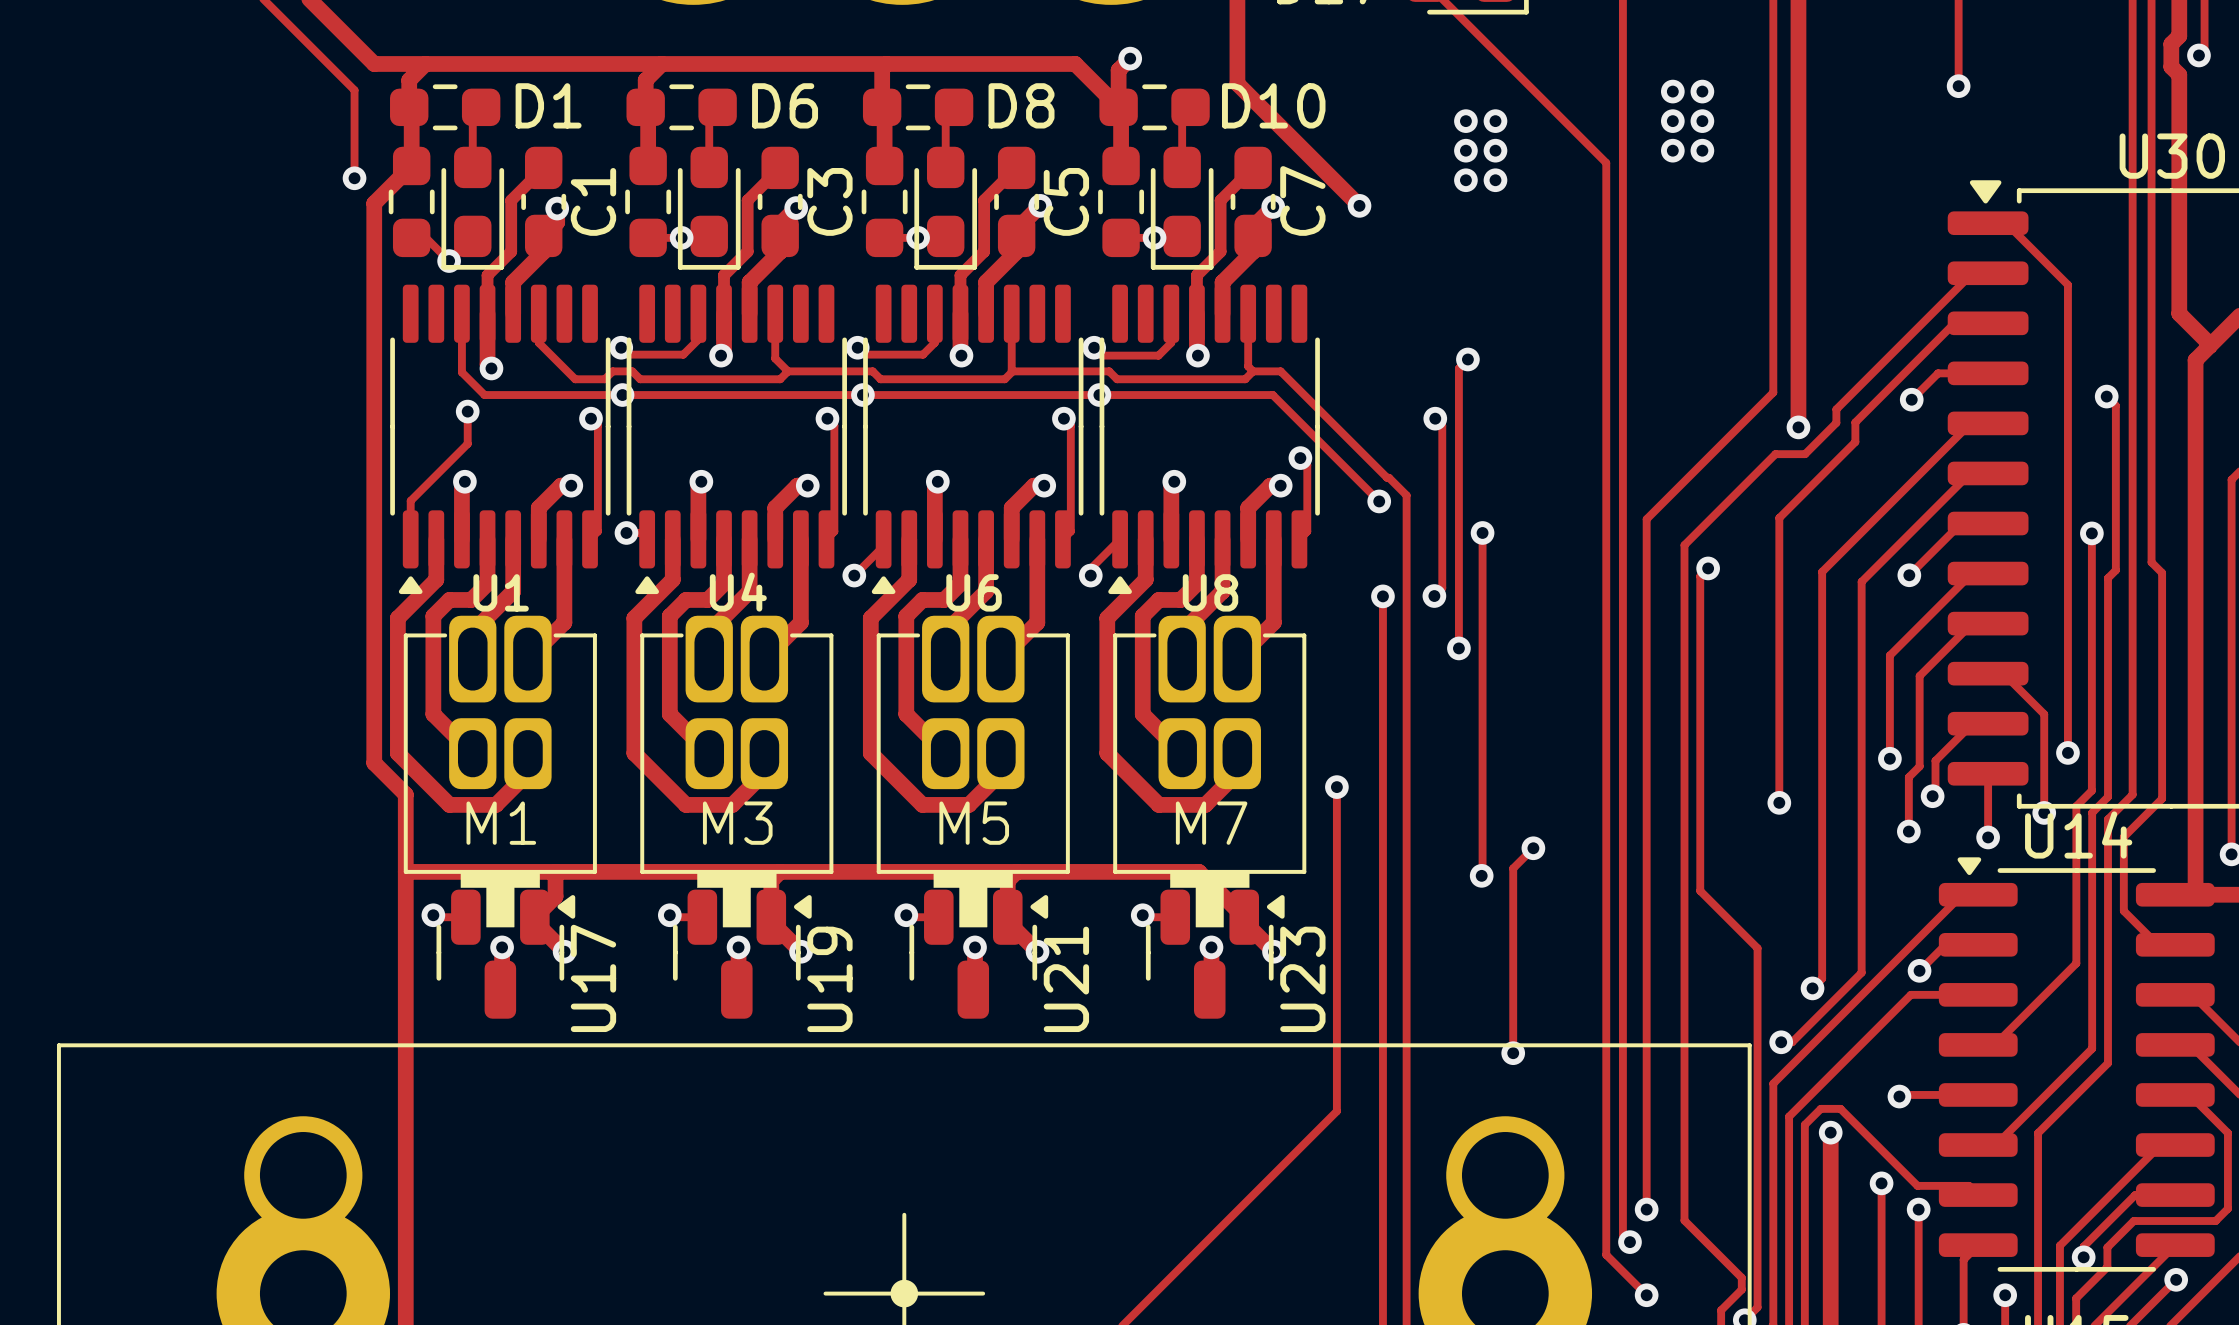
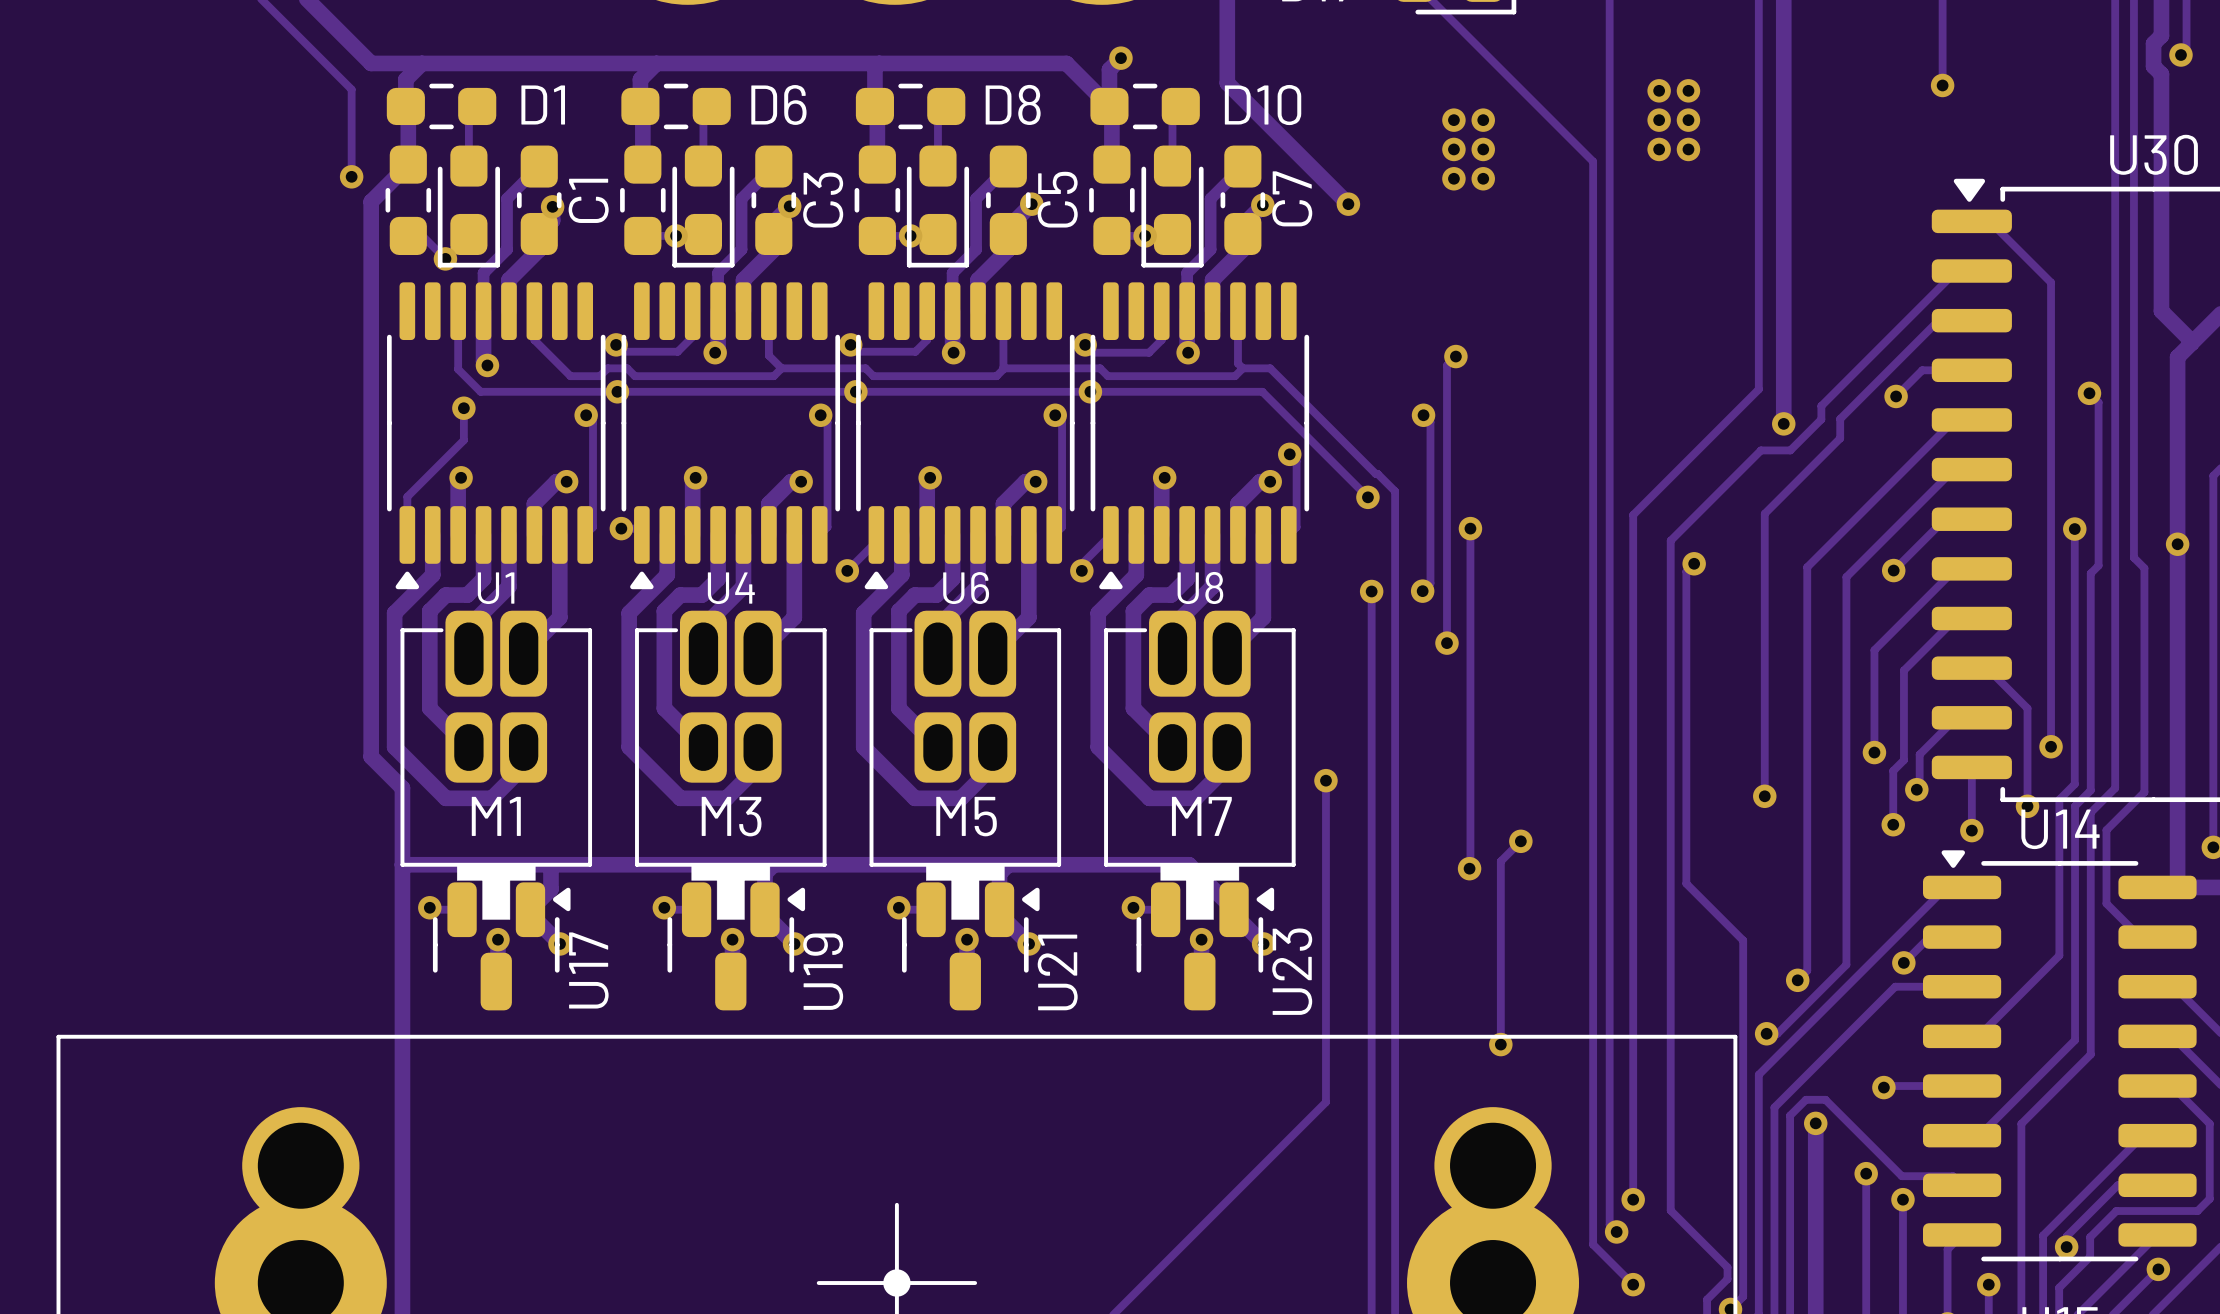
via: none -> (2177, 544)

